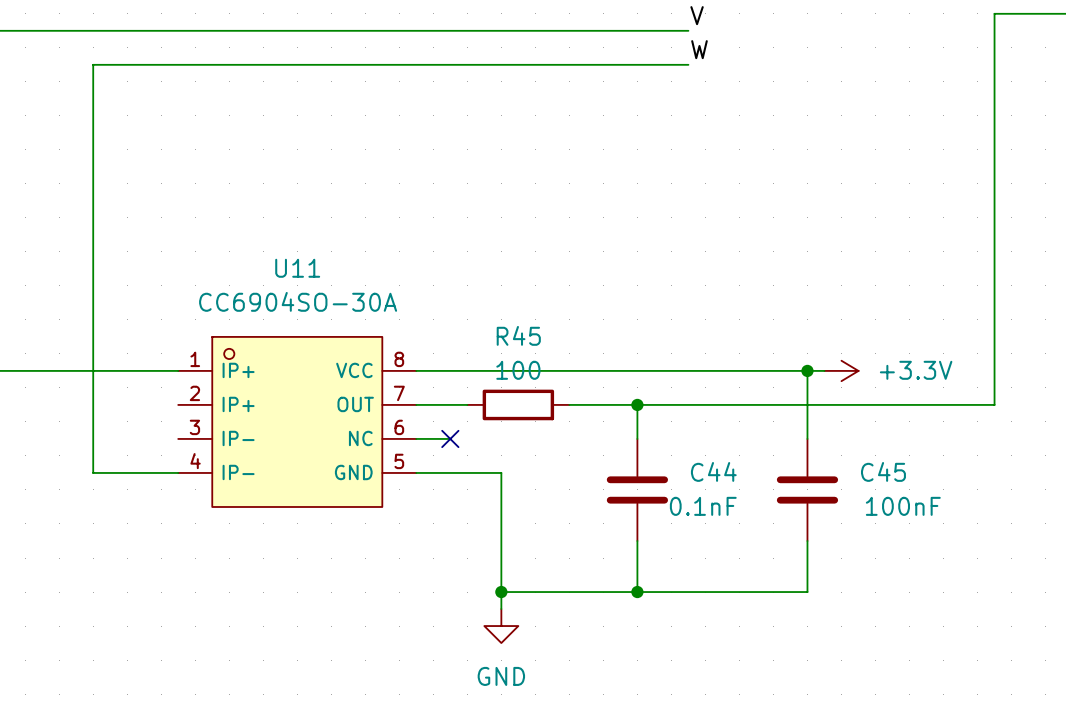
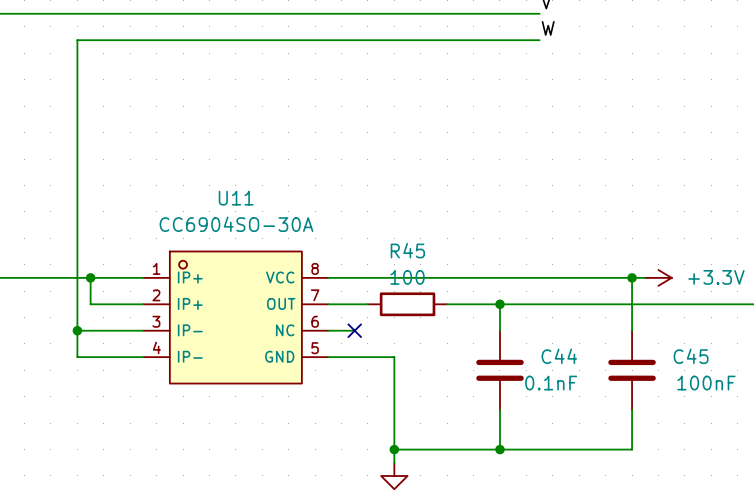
wire: none -> (90, 277) (90, 304) (143, 304)
junction: none -> (90, 277)
wire: none -> (77, 330) (143, 330)
junction: none -> (77, 330)

